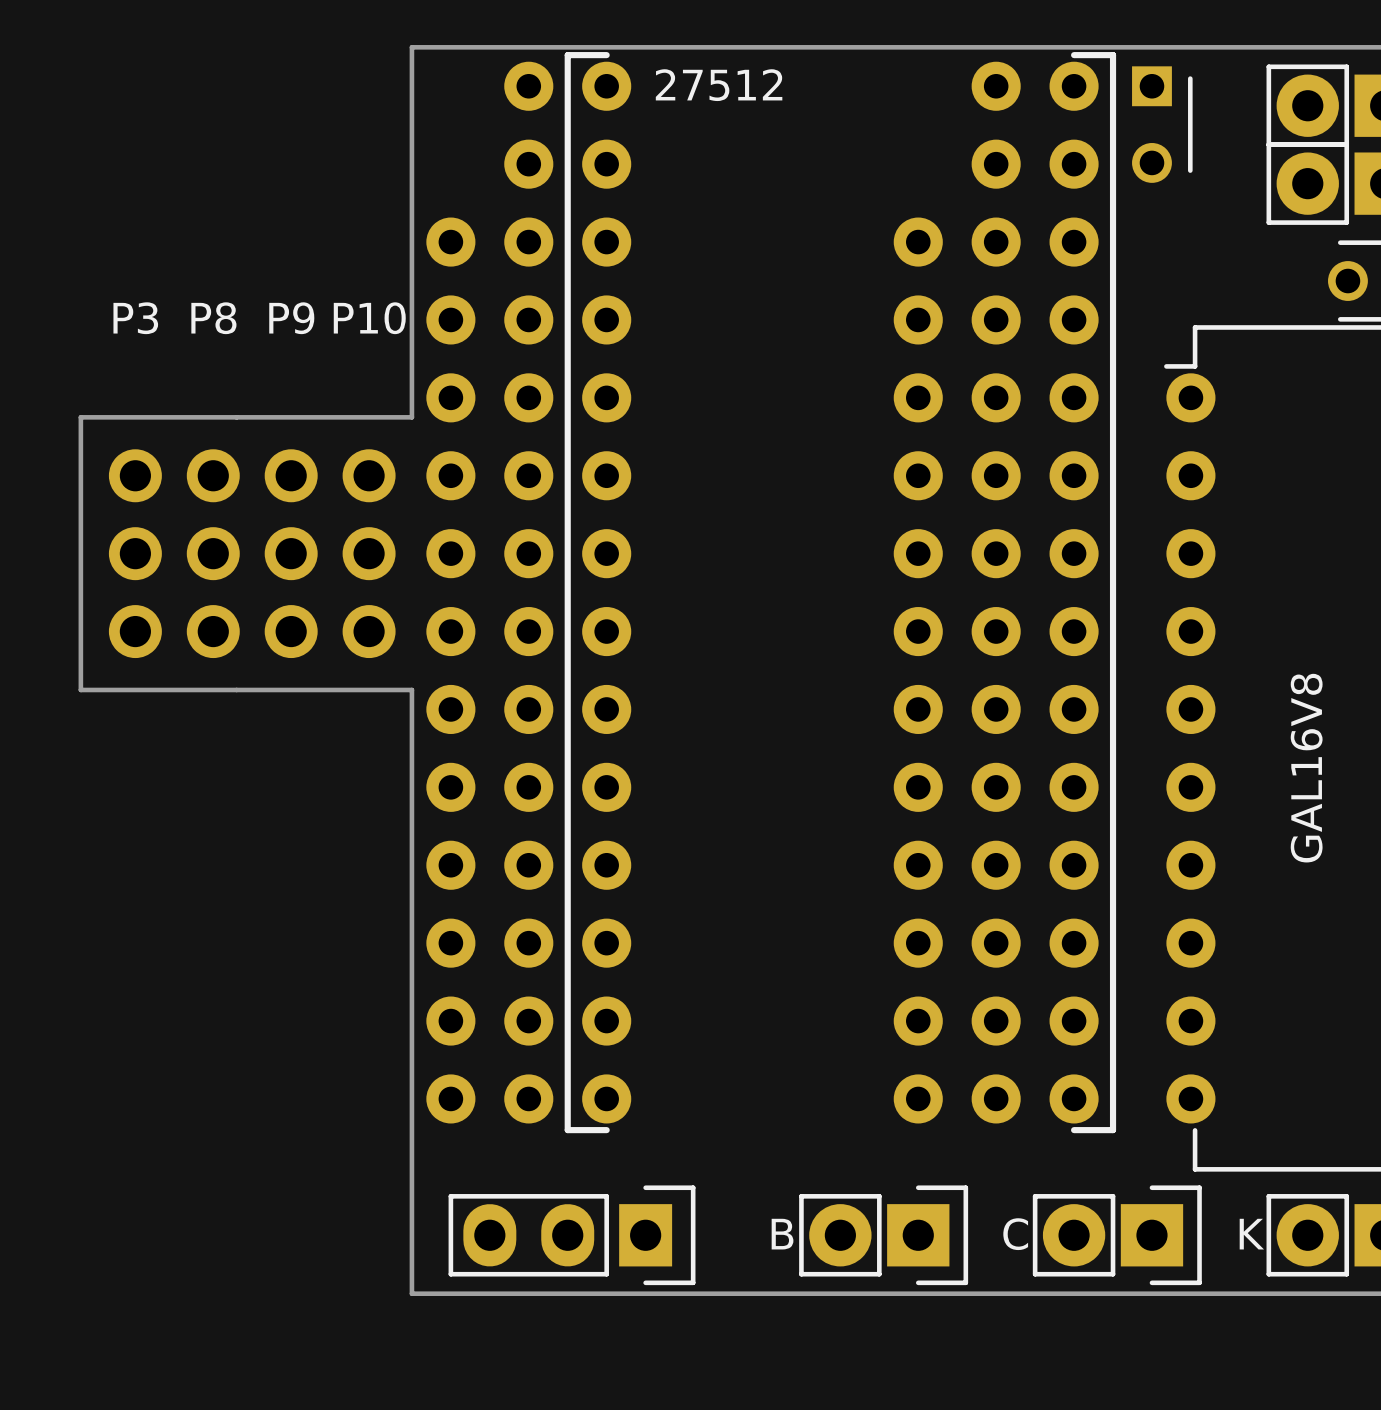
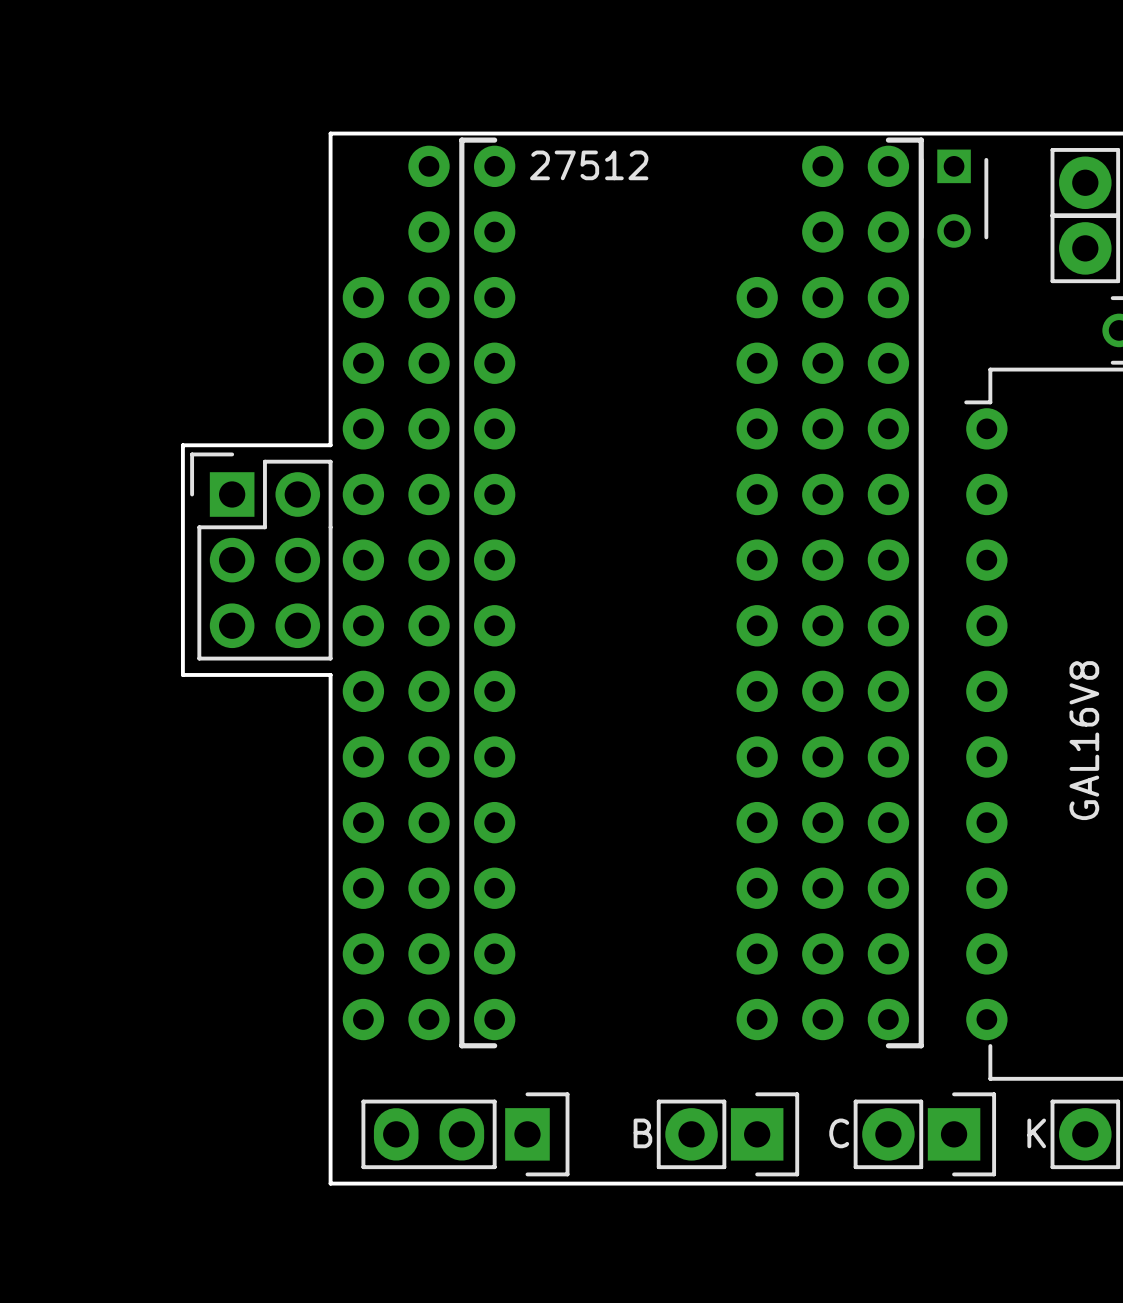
board edge: (236, 417) (80, 417) (80, 689) (236, 689) -> (182, 445) (182, 674)
part: none -> (261, 556)
P3: (135, 553) -> none
P8: (213, 553) -> none
P9: (291, 553) -> none
P10: (369, 553) -> none

